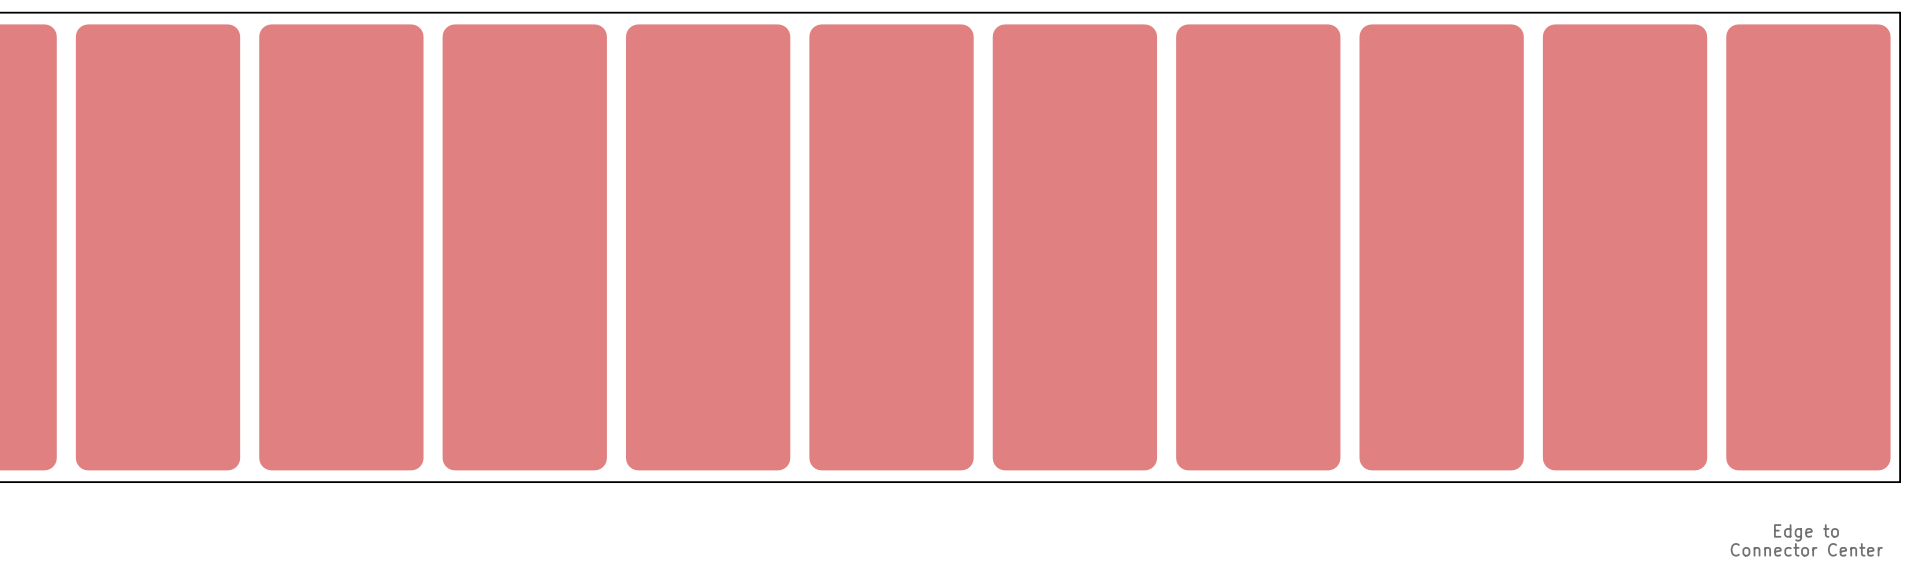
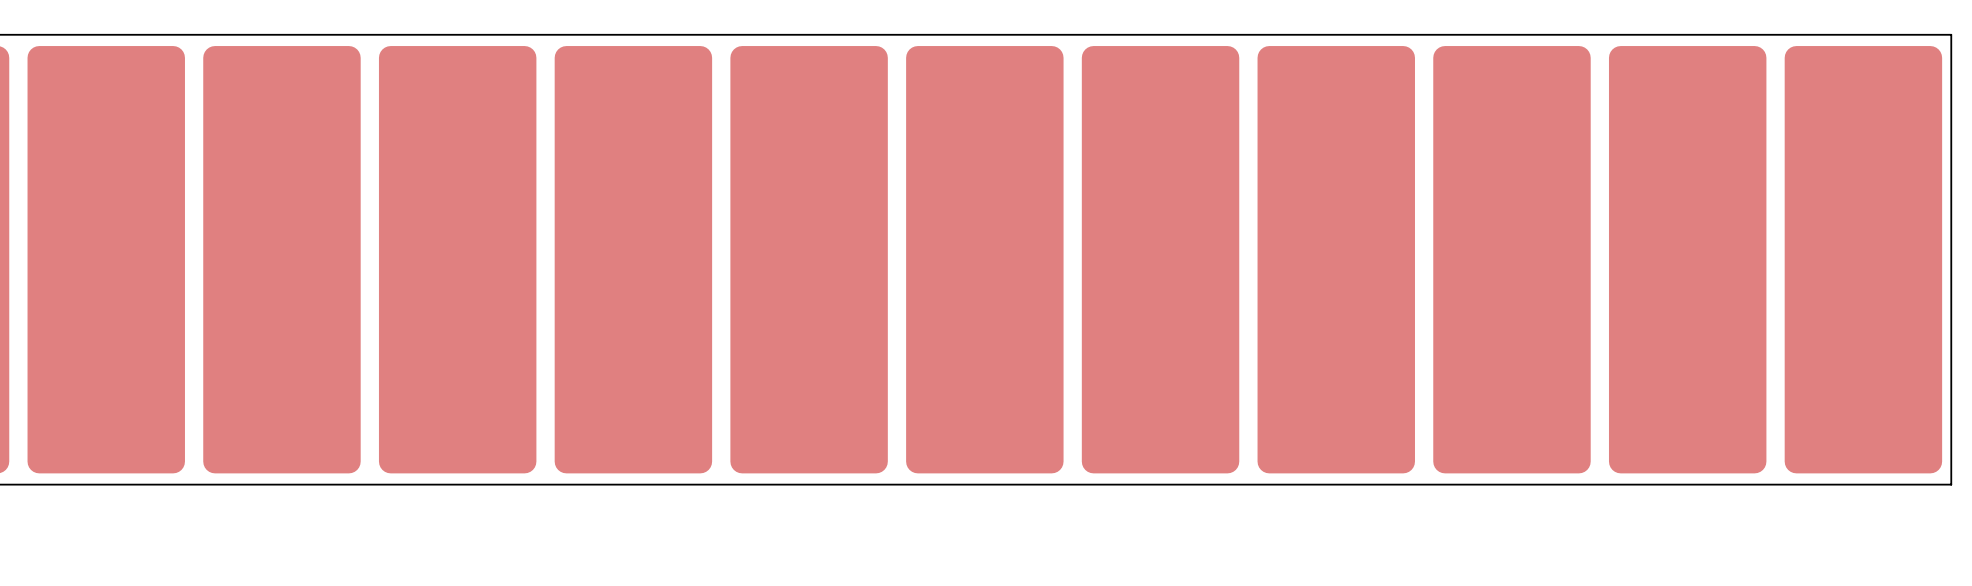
text: Edge to (1806, 532) -> none
text: Connector Center (1806, 549) -> none

